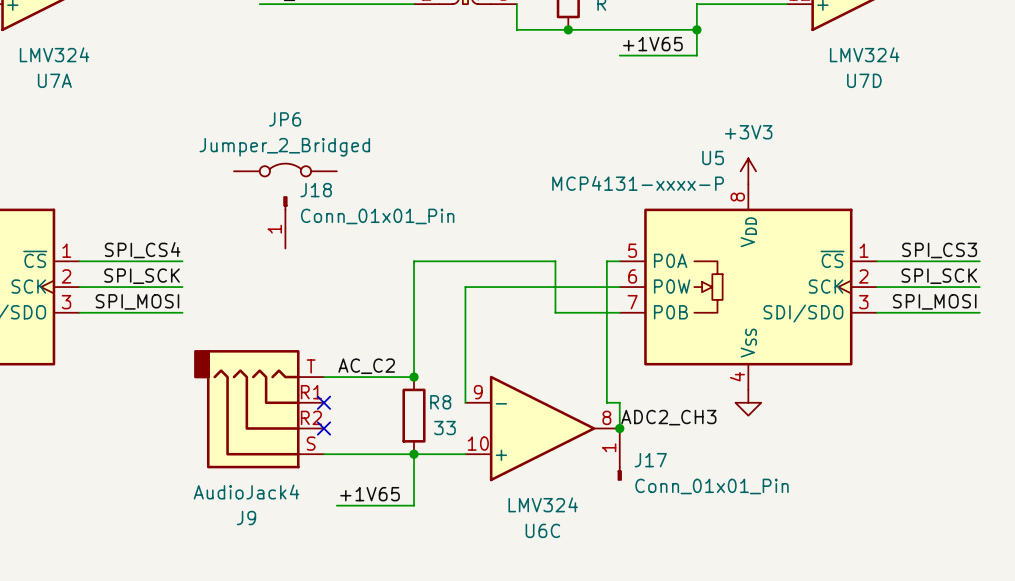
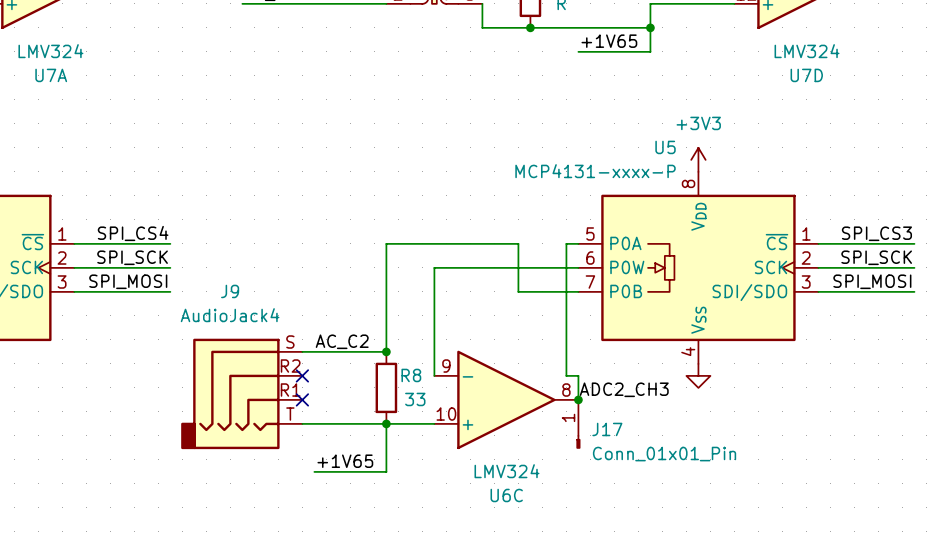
JP6: Jumper_2_Bridged (285, 170) -> none
J18: Conn_01x01_Pin (285, 222) -> none
J9 flip: as is (246, 409) -> up-down (230, 393)

